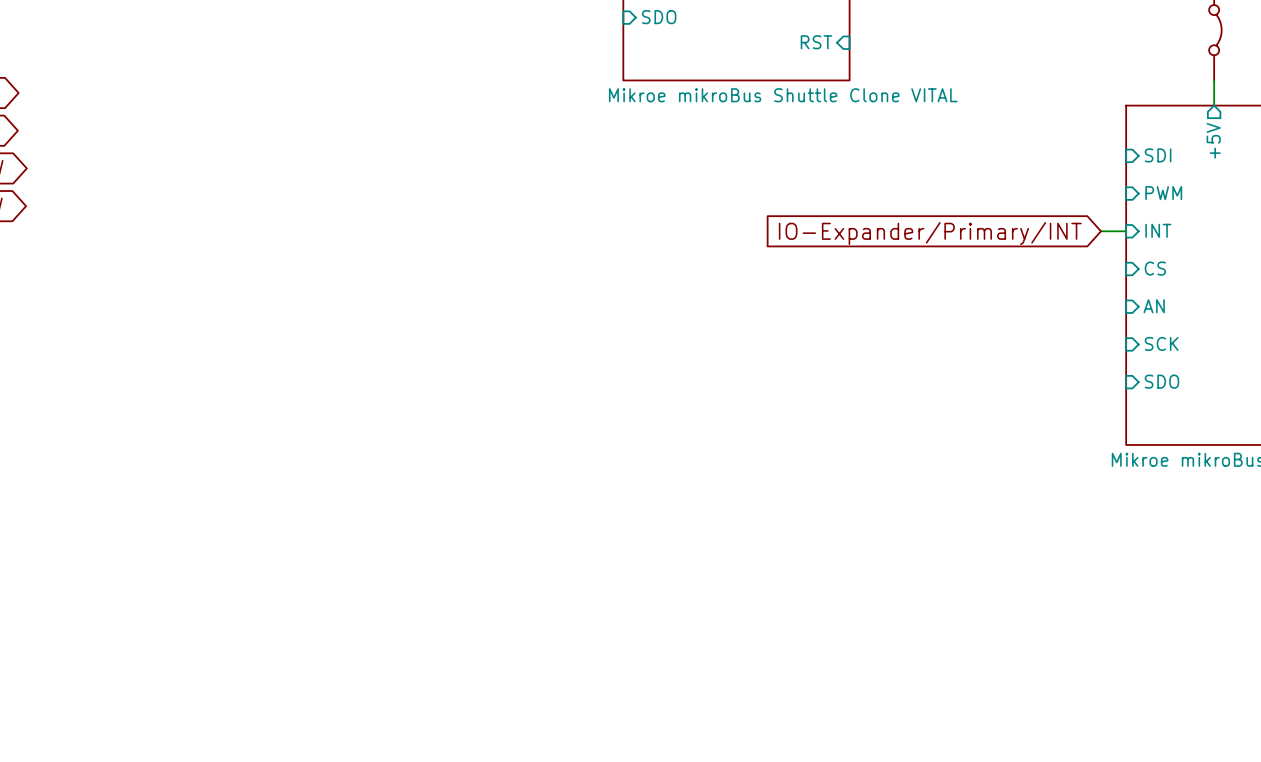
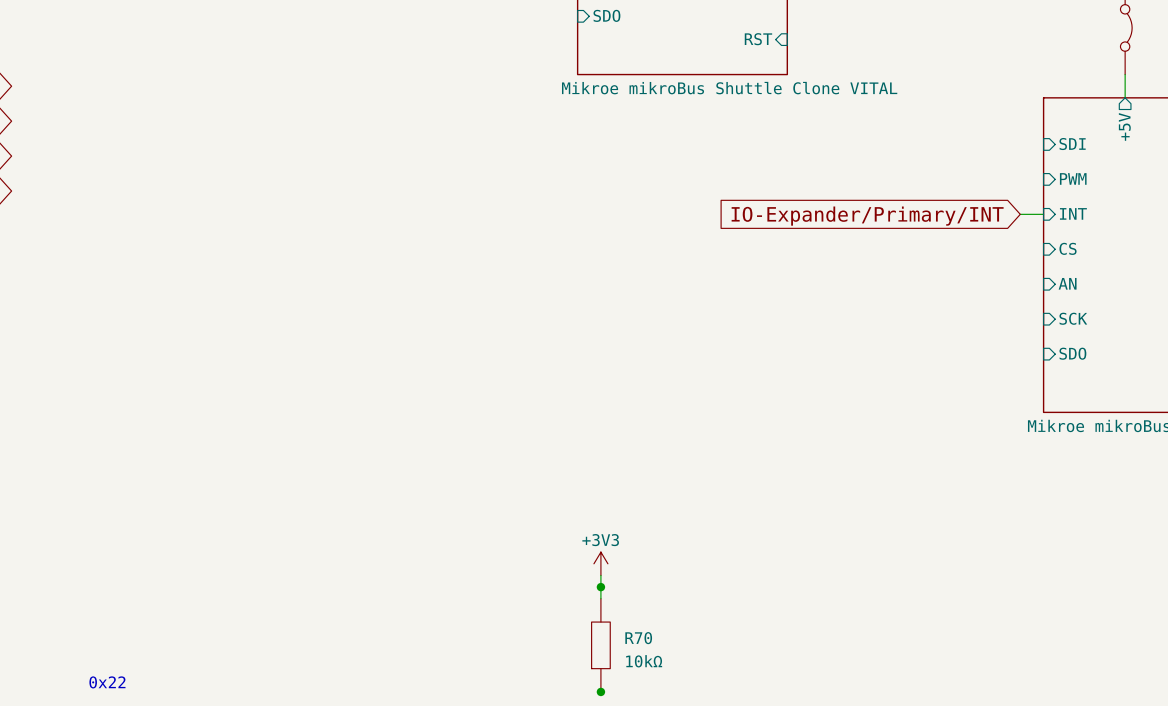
power symbol: none -> +3V3 (600, 563)
wire: none -> (600, 575) (600, 598)
junction: none -> (600, 587)
R70: none -> 10kΩ (600, 645)
text: none -> 0x22 (107, 682)
junction: none -> (600, 691)

